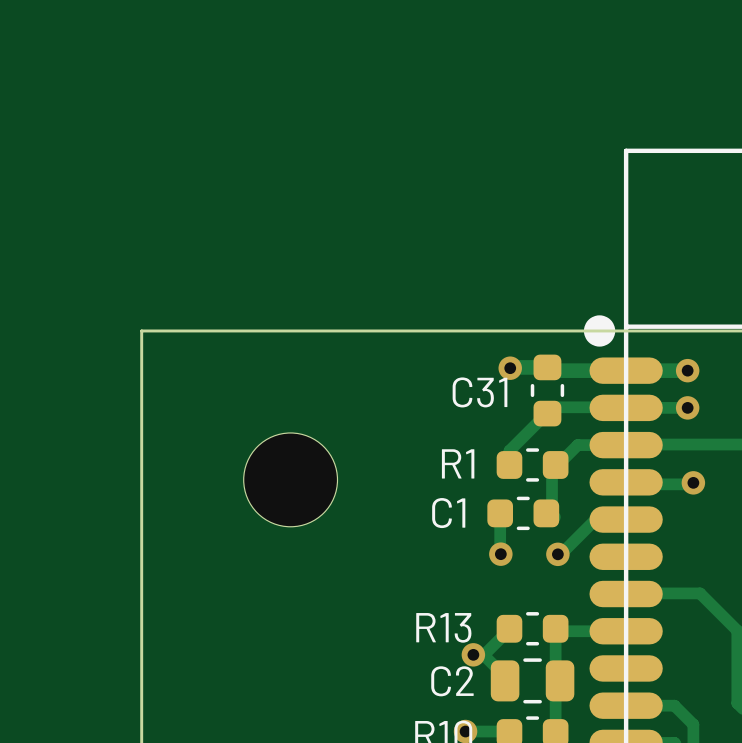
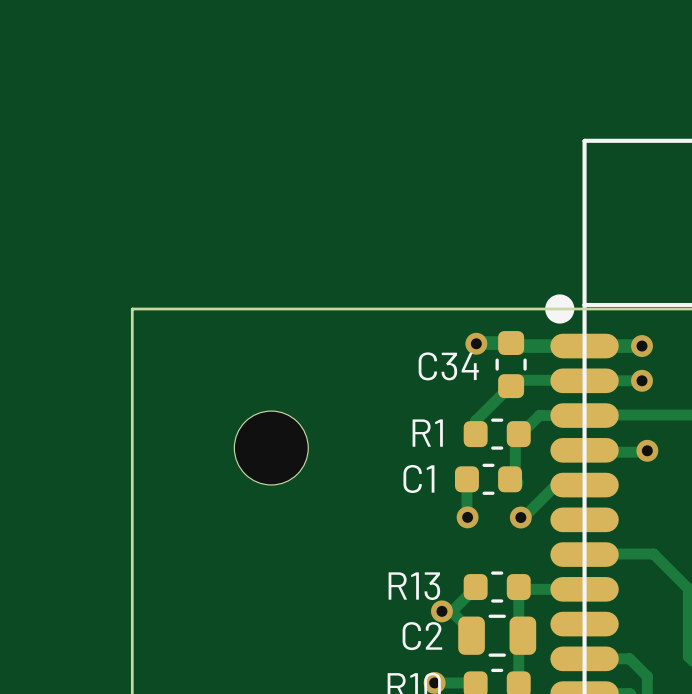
C31 name: C31 (480, 392) -> C34 (448, 366)
part footprint: [243, 432, 338, 527] -> [234, 411, 309, 485]

